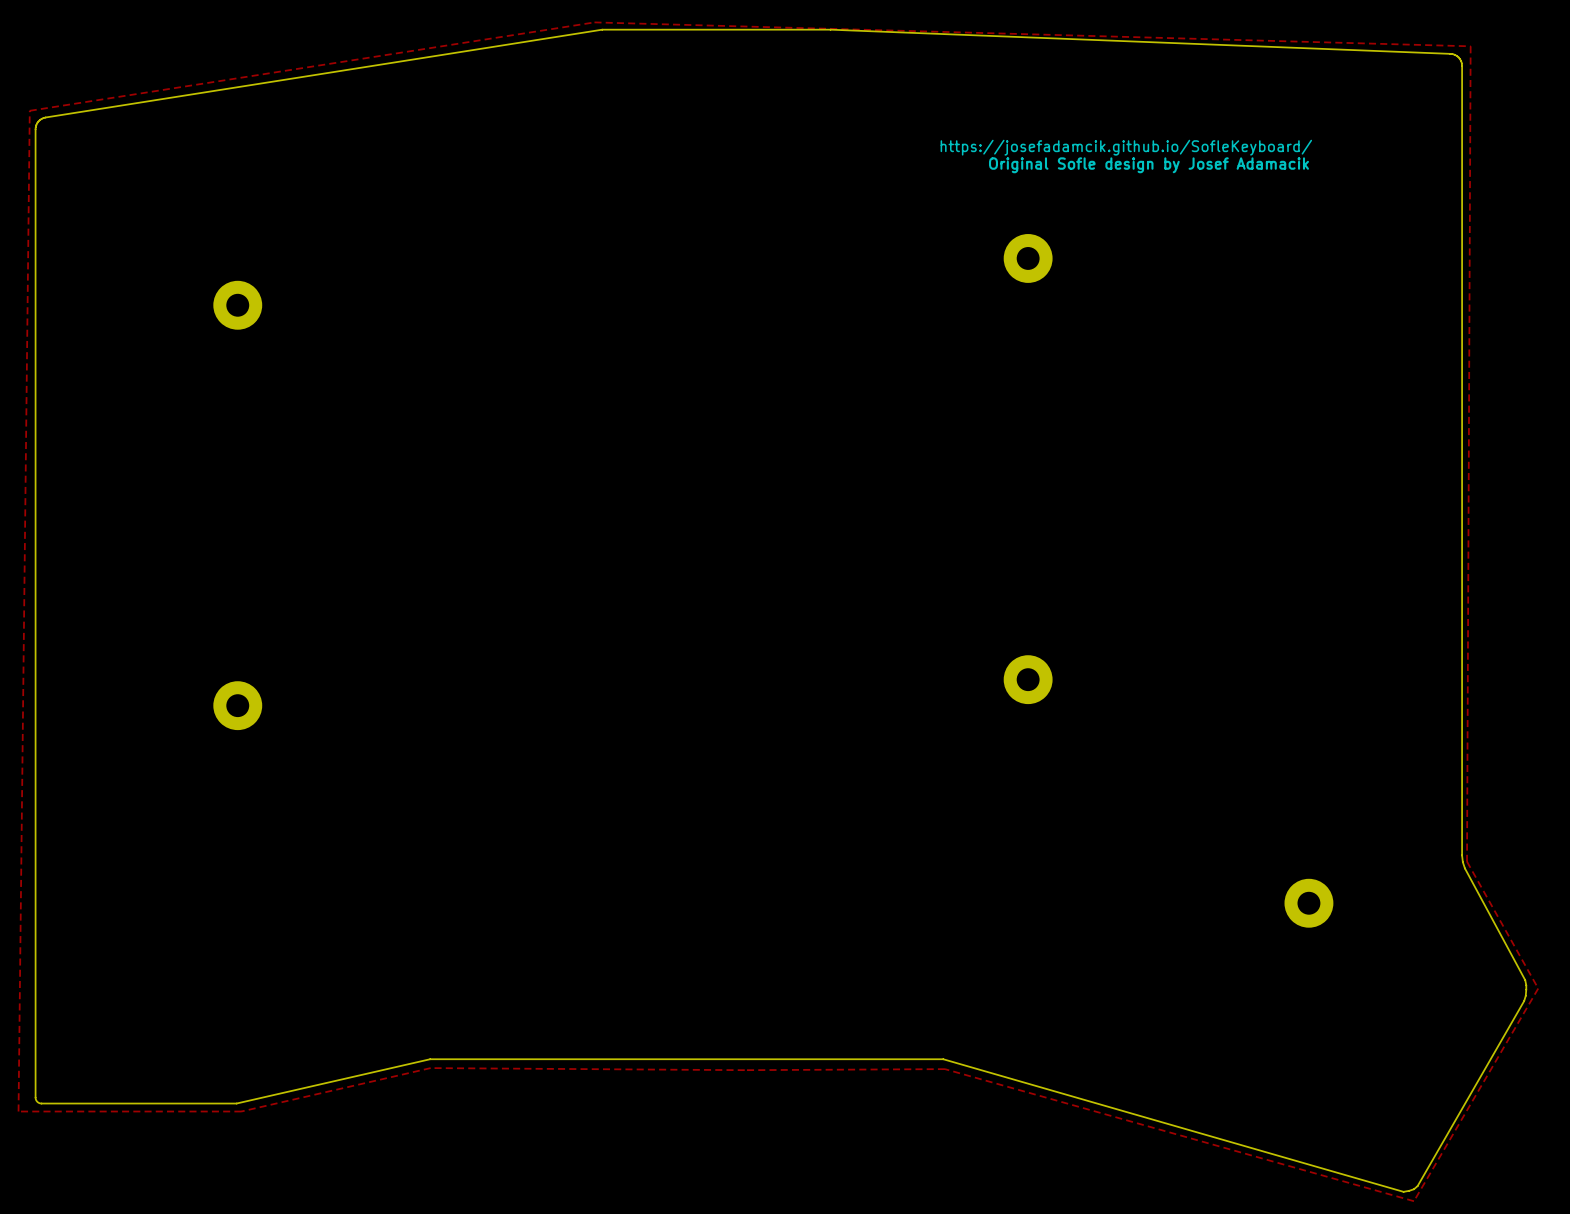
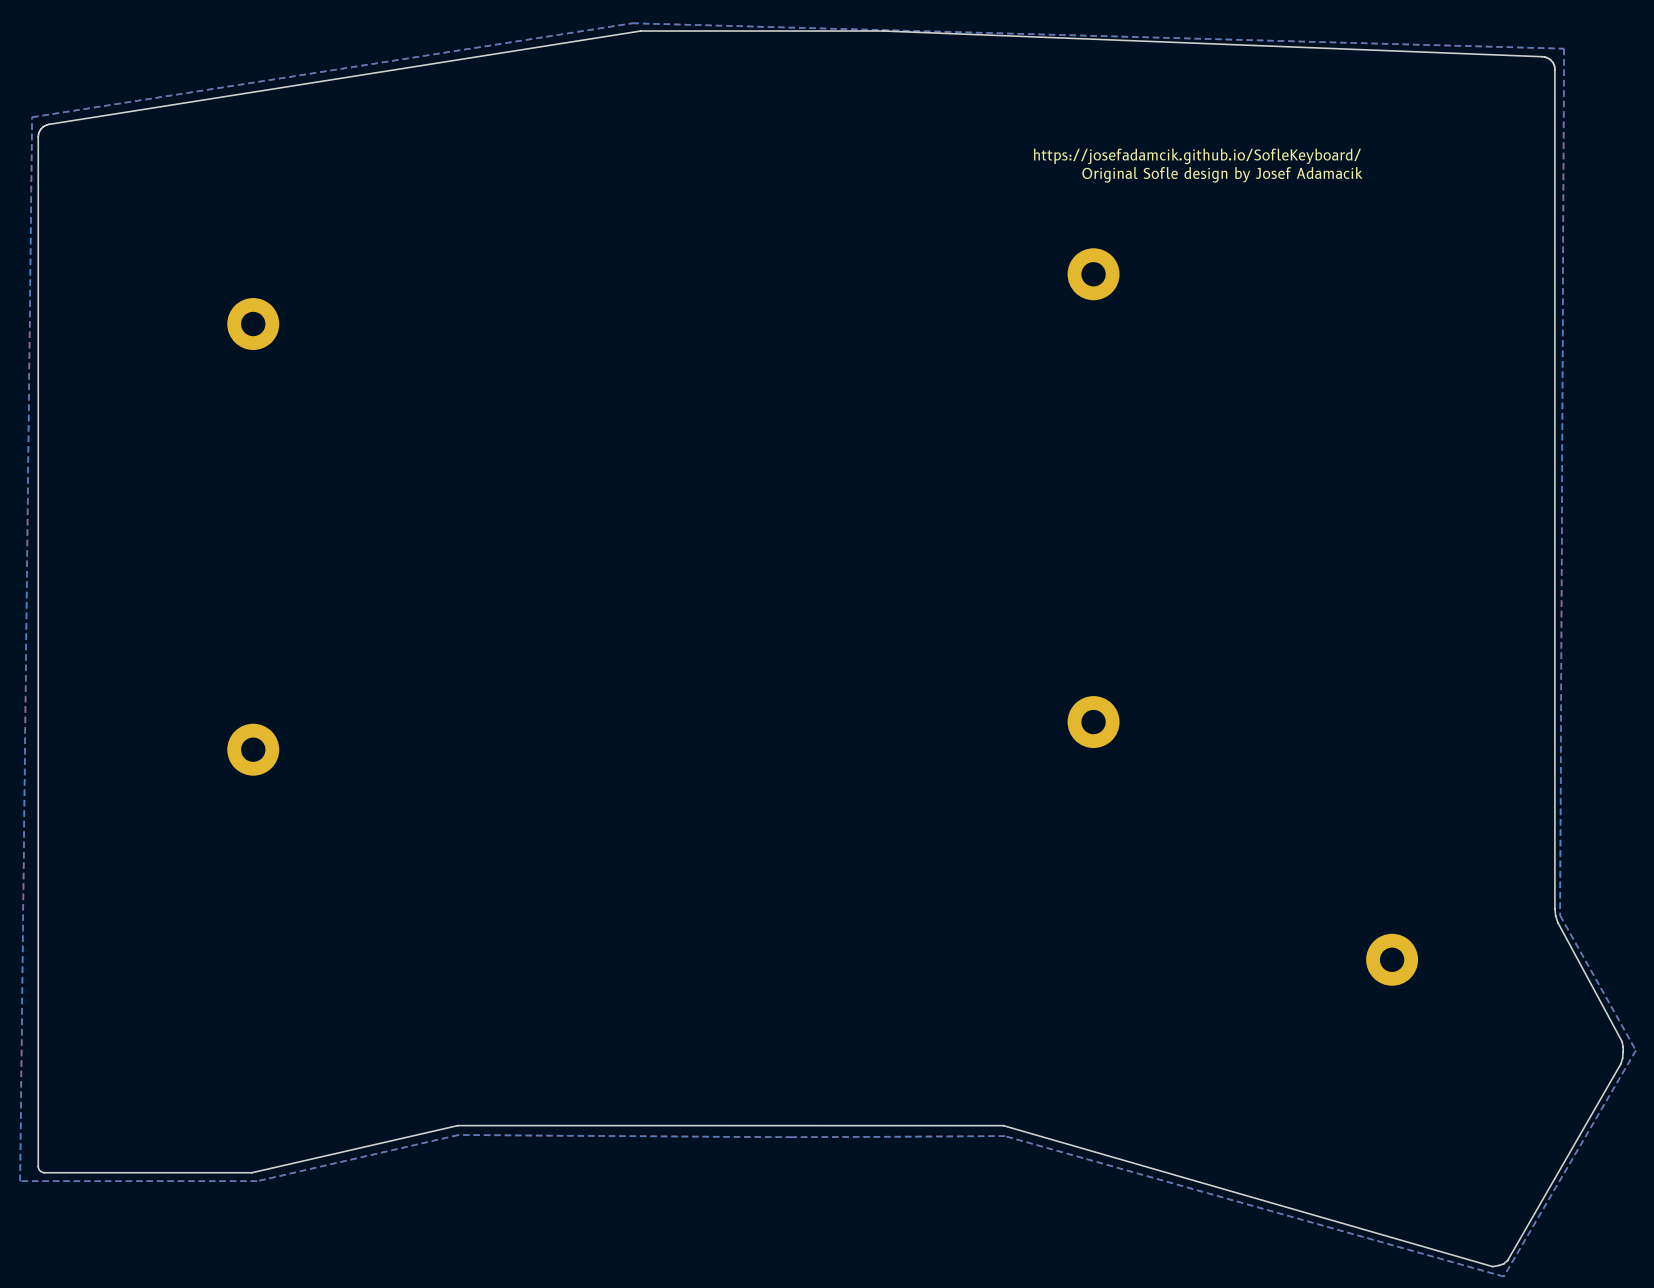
bottom zone outline: none -> (632, 23) (32, 117) (20, 1181) (257, 1181) (458, 1135) (792, 1137) (1005, 1136) (1503, 1276) (1635, 1050) (1560, 915) (1564, 48) (632, 23)

